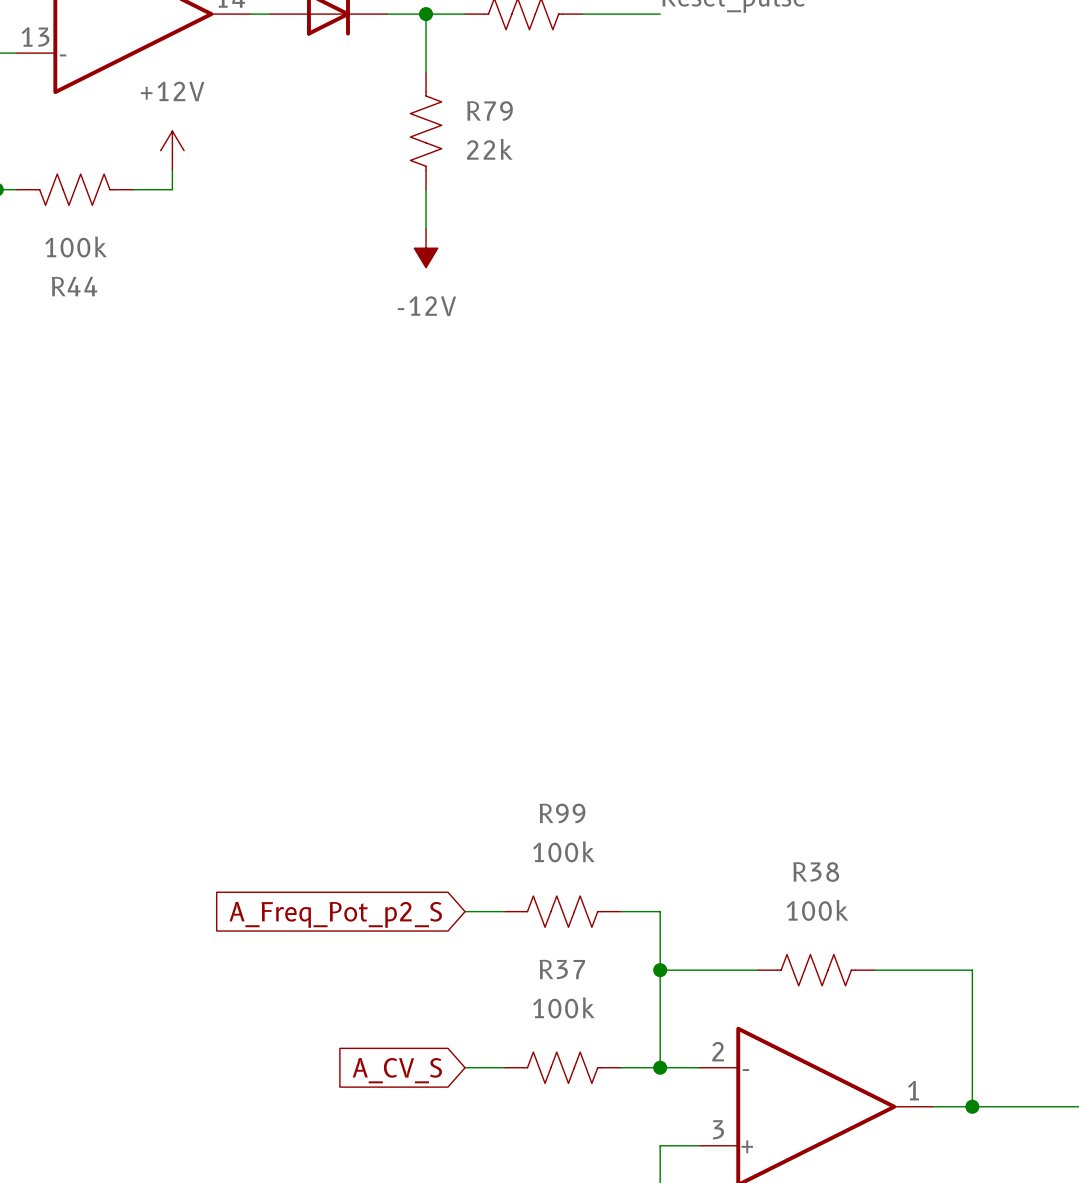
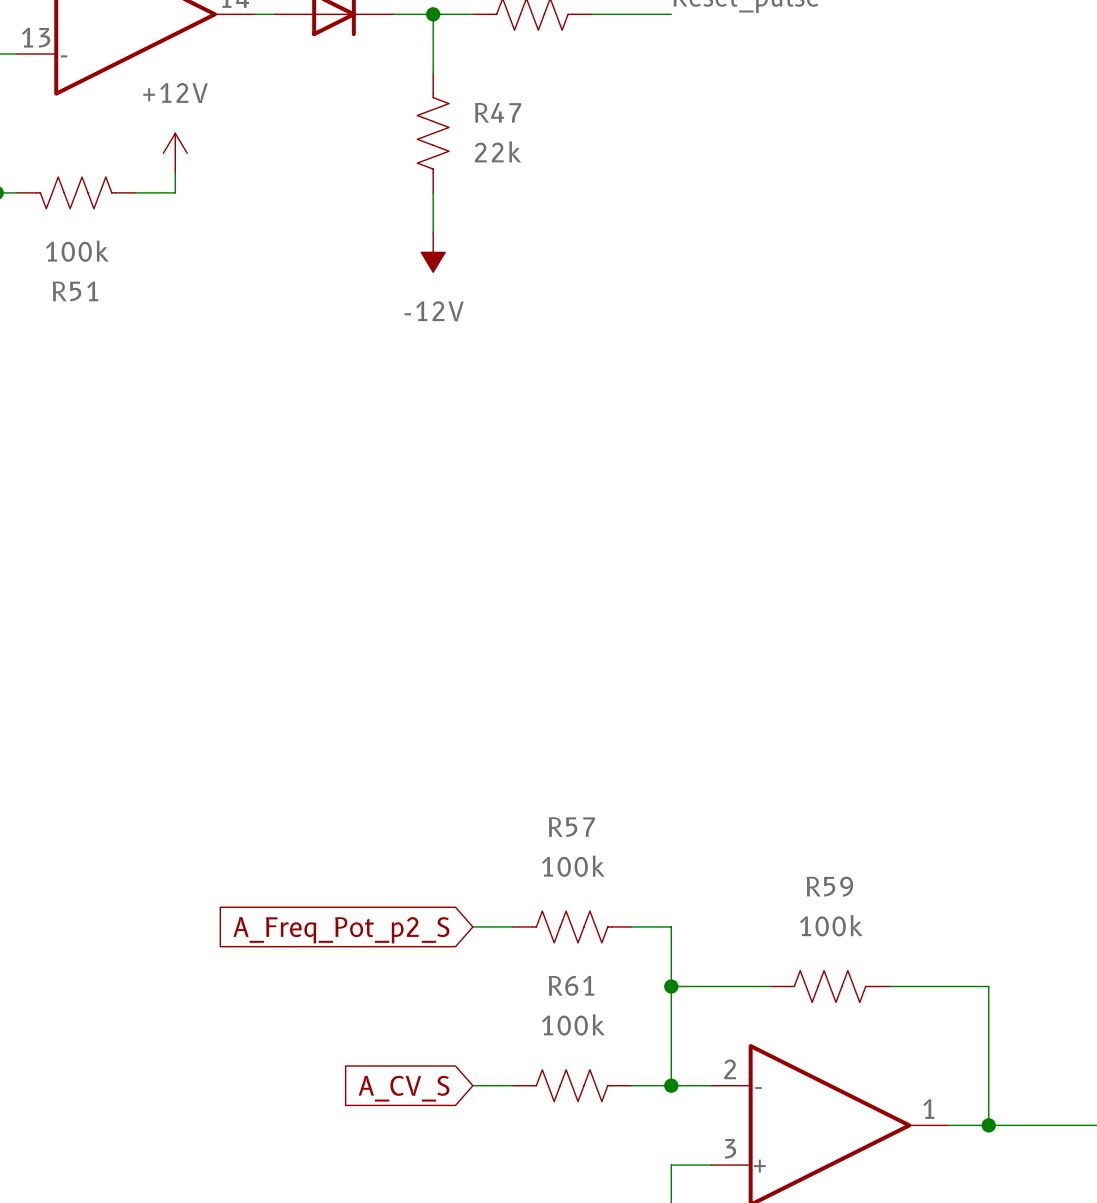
R79 name: R79 (489, 111) -> R47 (498, 112)
R44 name: R44 (74, 286) -> R51 (75, 291)
R99 name: R99 (562, 813) -> R57 (571, 827)
R38 name: R38 (816, 872) -> R59 (829, 886)
R37 name: R37 (562, 969) -> R61 (571, 985)

